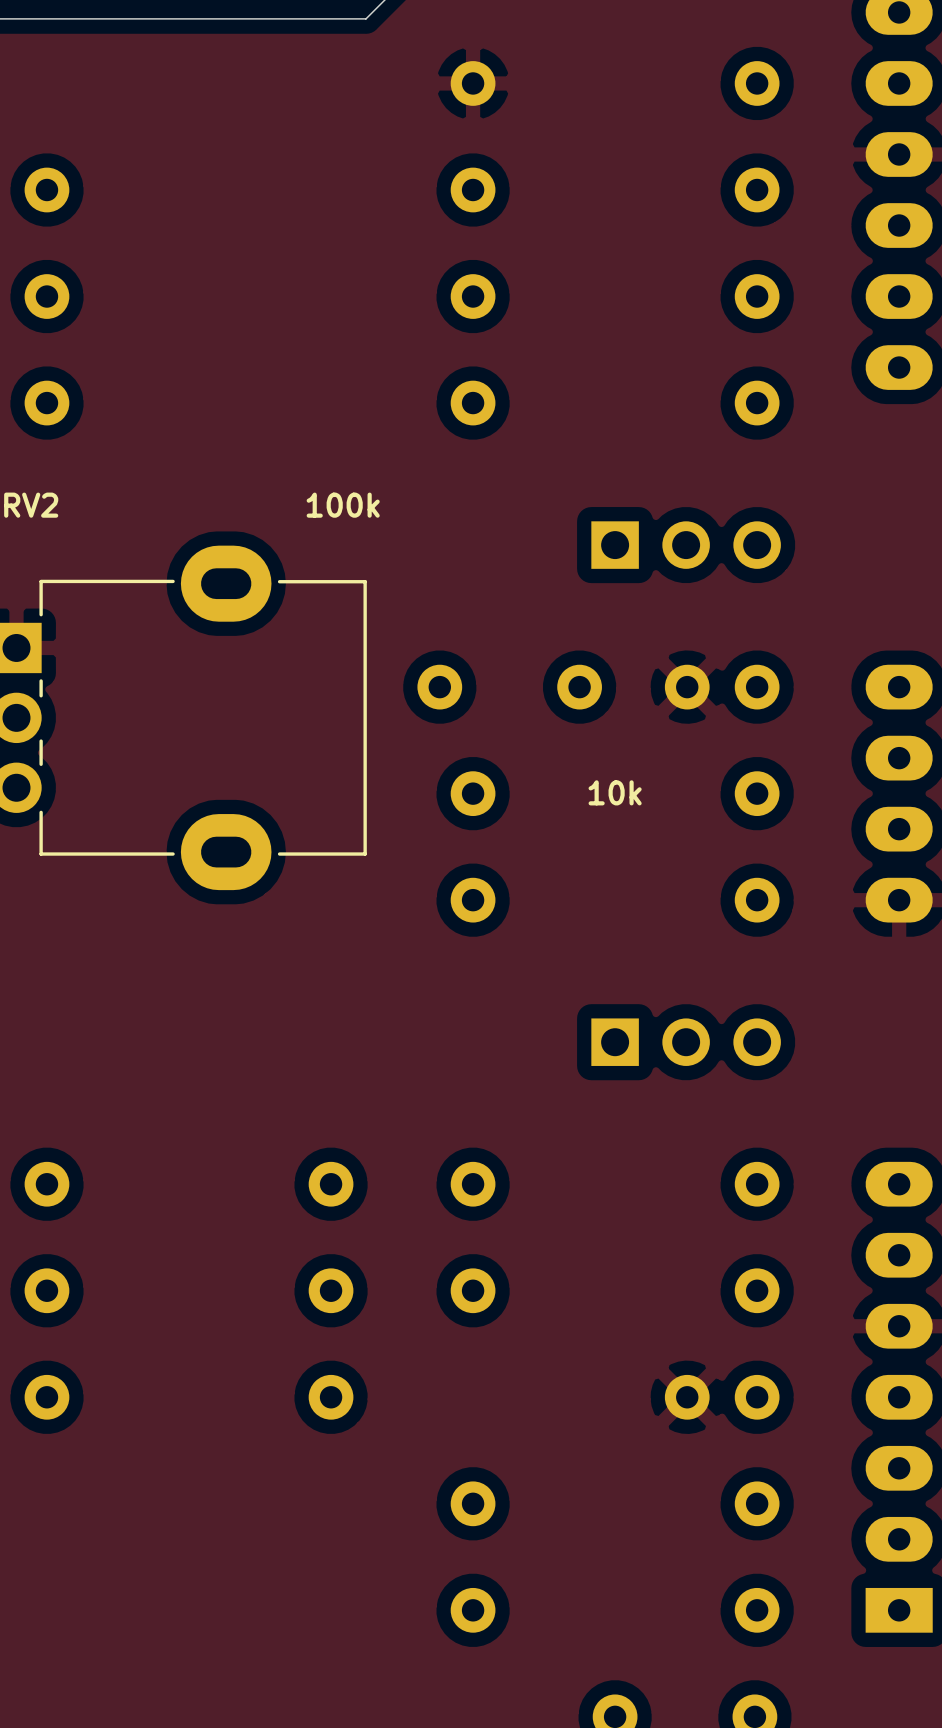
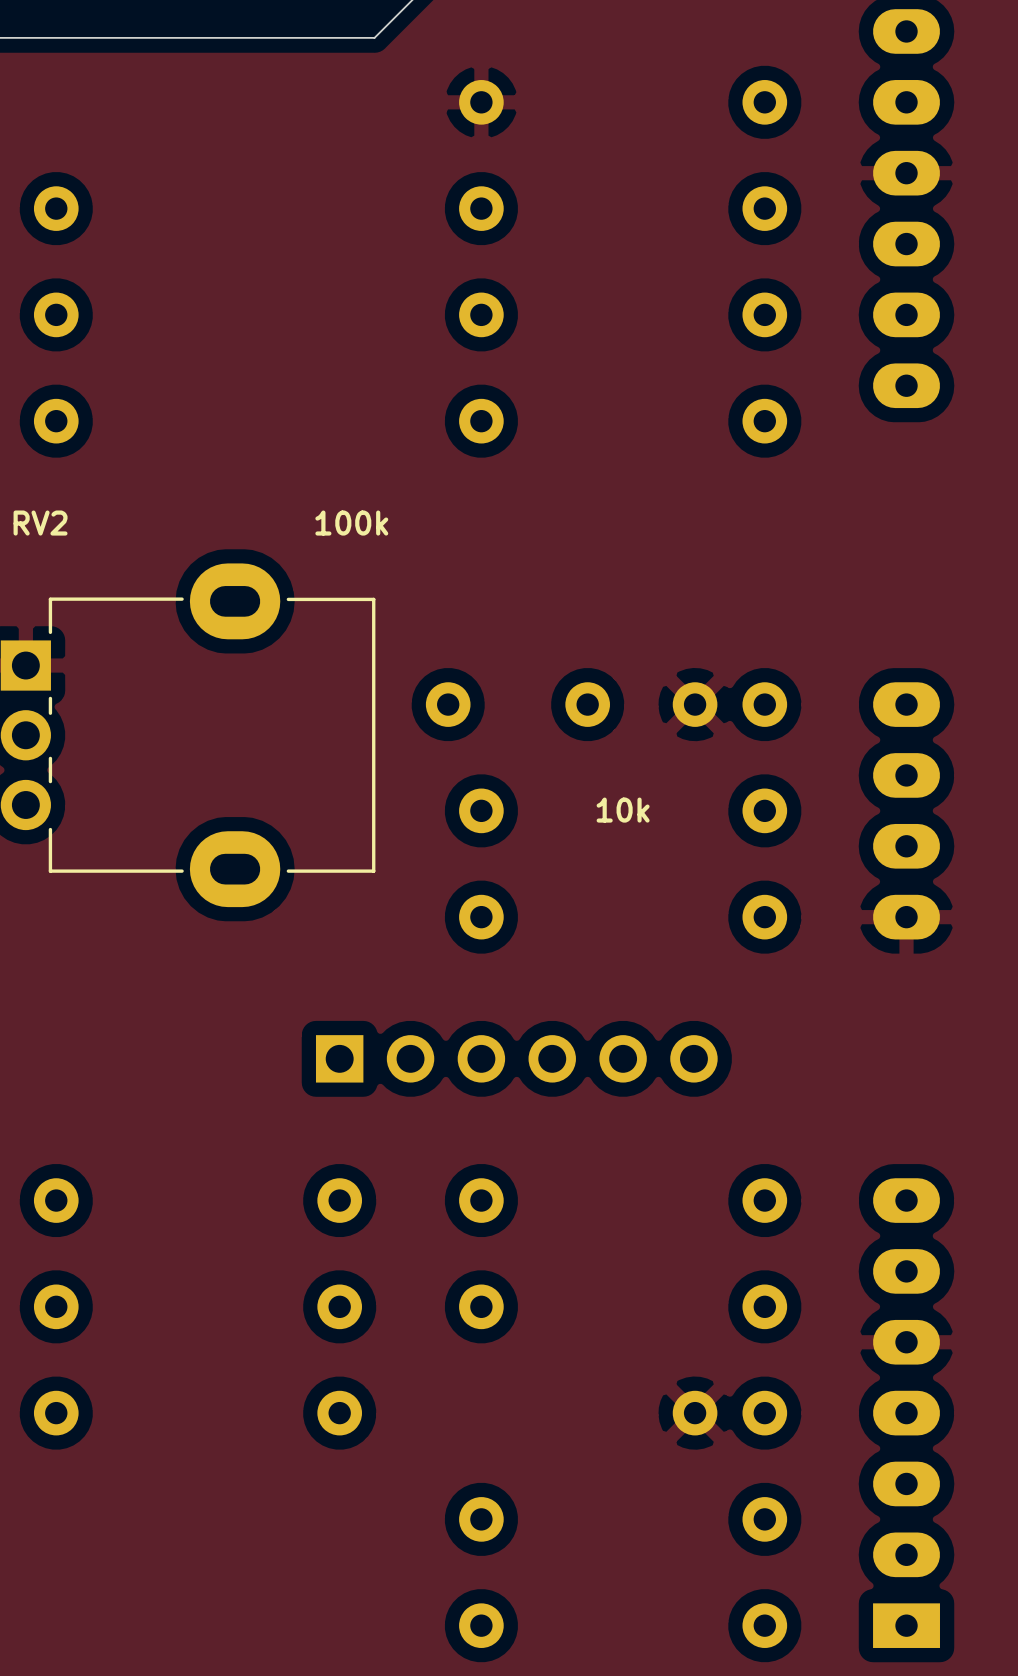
part: (686, 545) -> none
part: none -> (516, 1058)
part: (686, 1042) -> none

